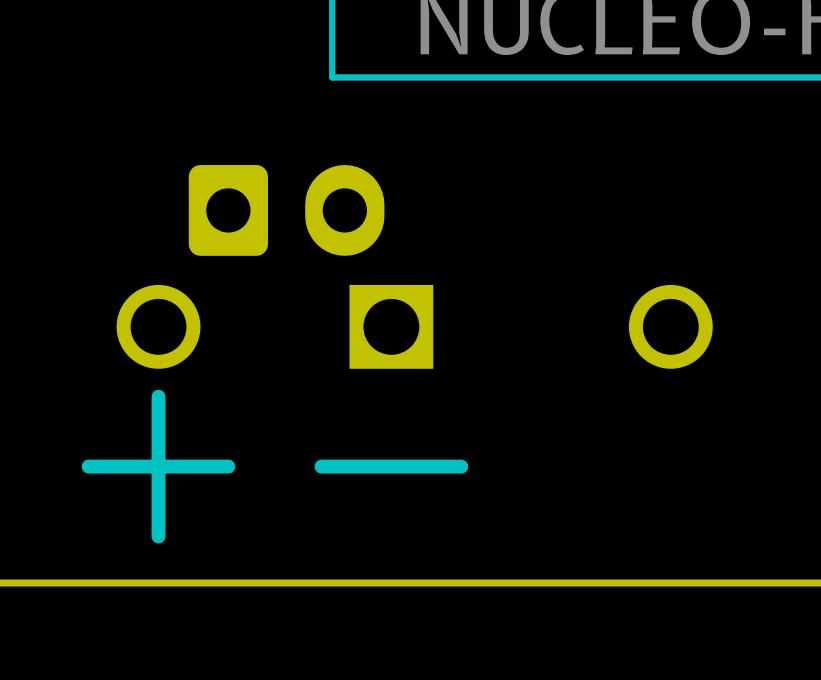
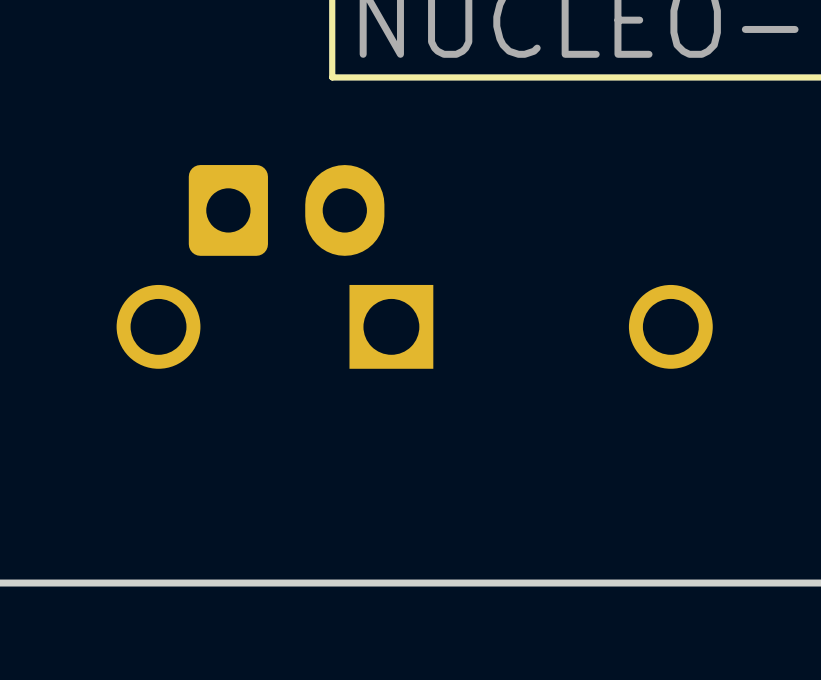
line: (158, 396) (158, 536) -> none
line: (228, 466) (88, 466) -> none
line: (461, 466) (321, 466) -> none

